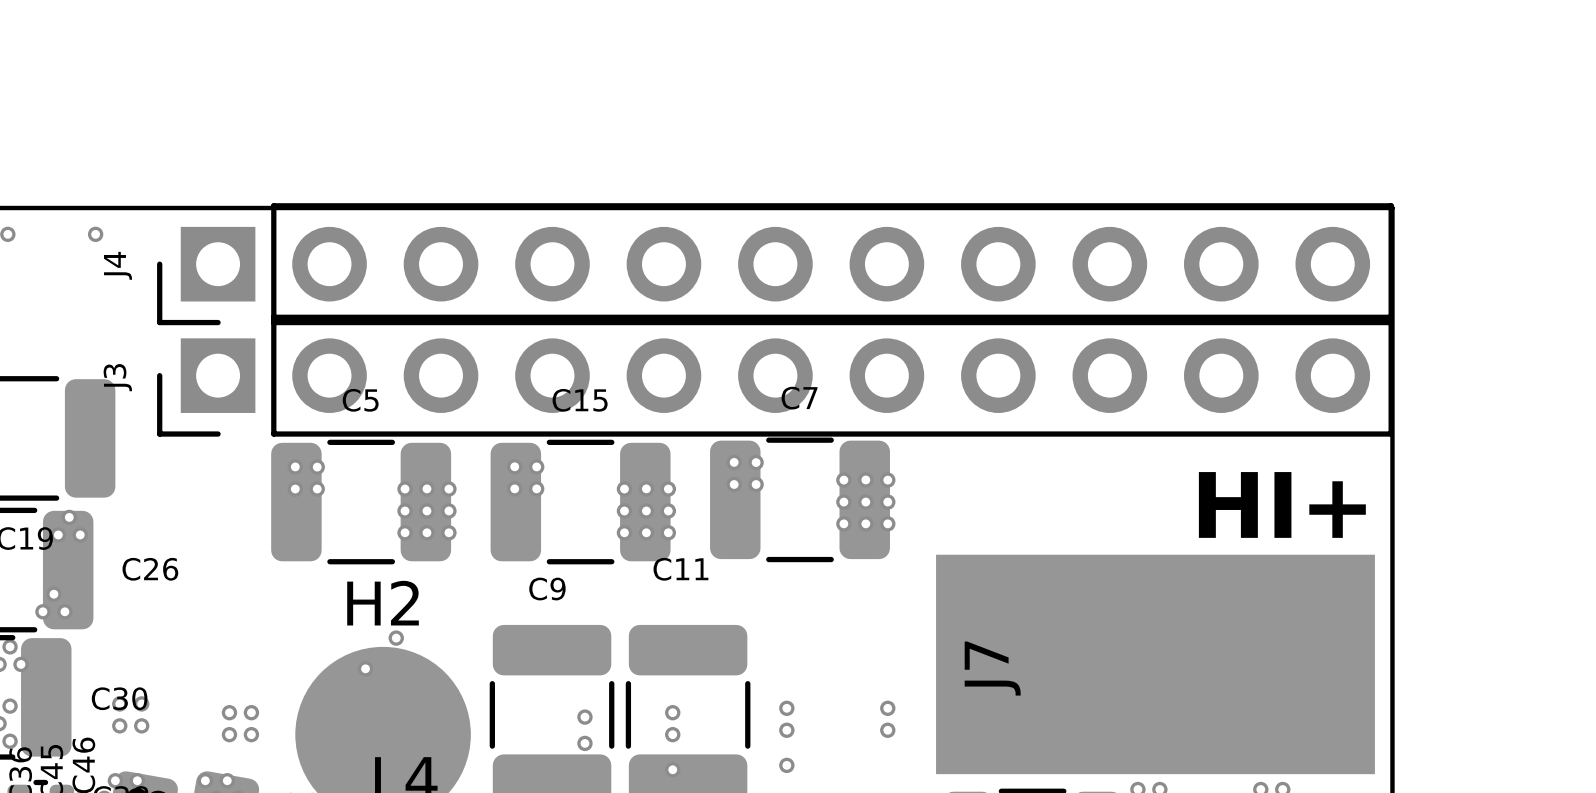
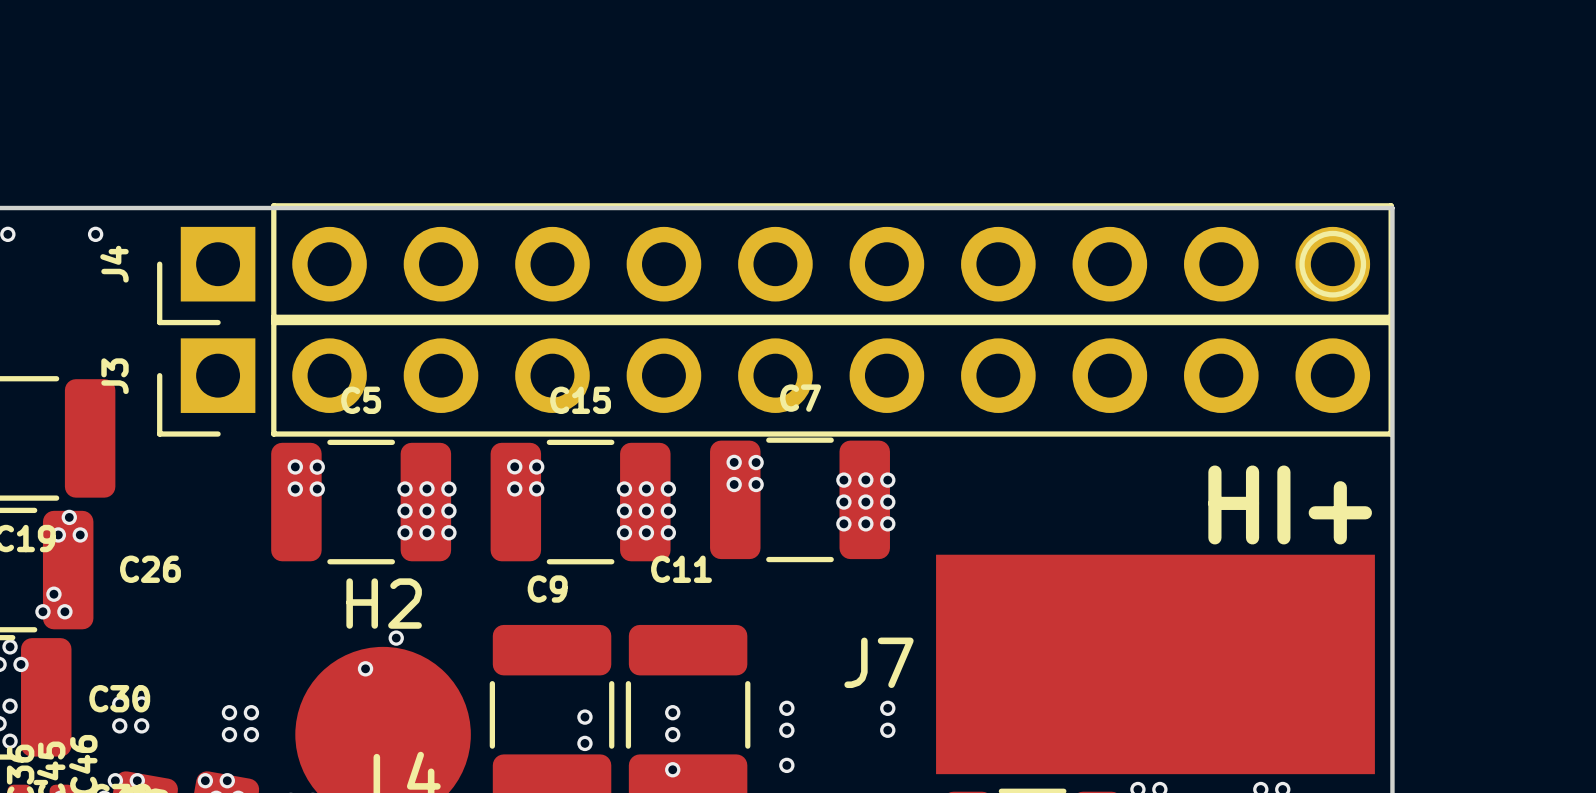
drawing: none -> [1299, 230, 1367, 298]
J7 name rotation: 0° (992, 668) -> 90° clockwise (879, 662)
J7 name position: J7 (992, 668) -> J7 (879, 662)

